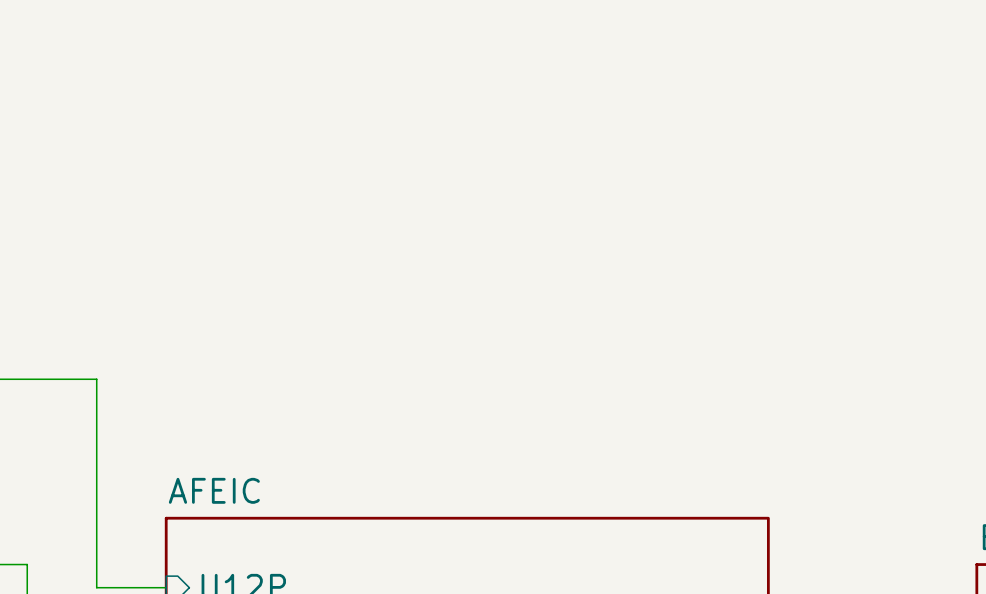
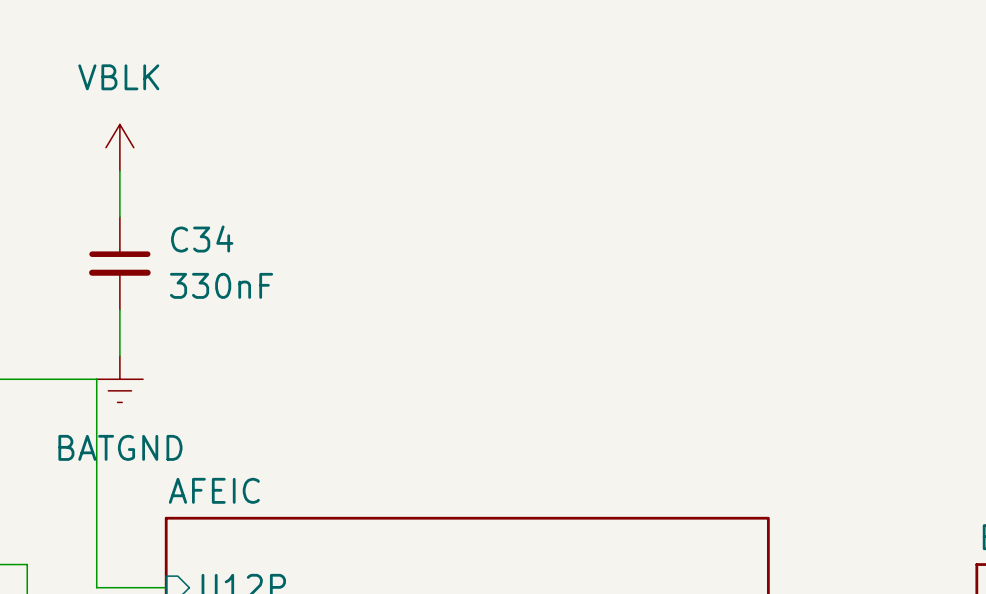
power symbol: none -> VBLK (119, 147)
wire: none -> (119, 170) (119, 217)
C34: none -> 330nF (119, 263)
wire: none -> (119, 309) (119, 356)
power symbol: none -> BATGND (119, 379)

